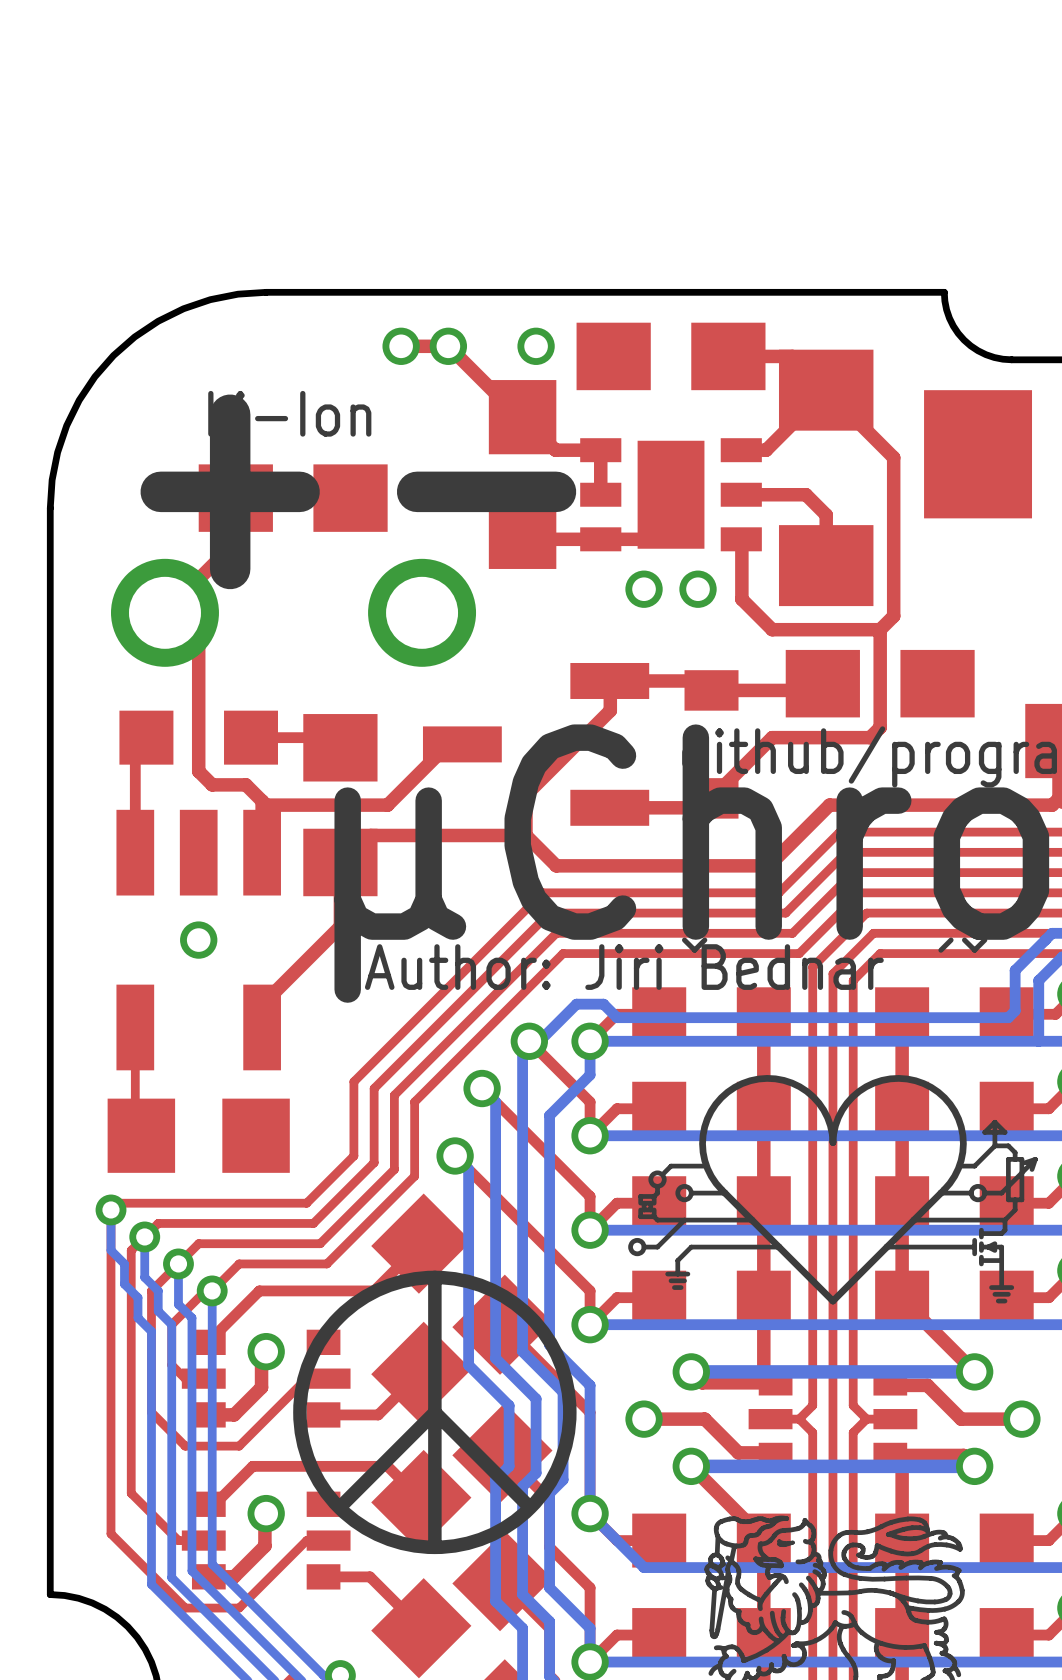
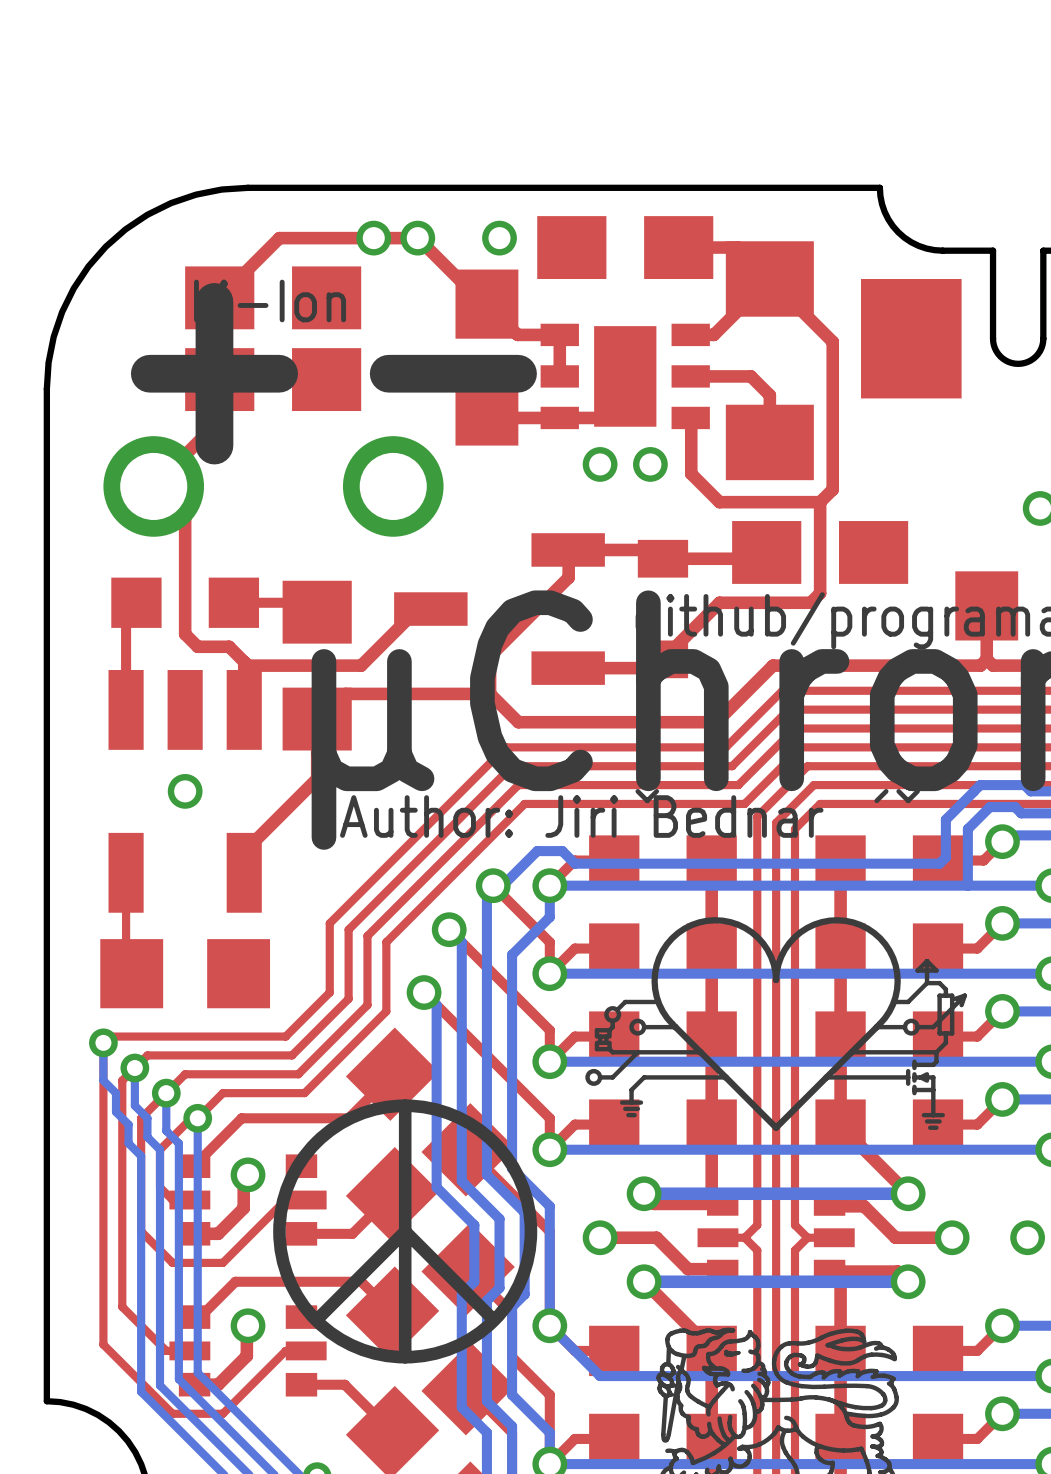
top track: none -> (373, 238) (279, 238) (219, 297)
part: none -> (273, 297)

